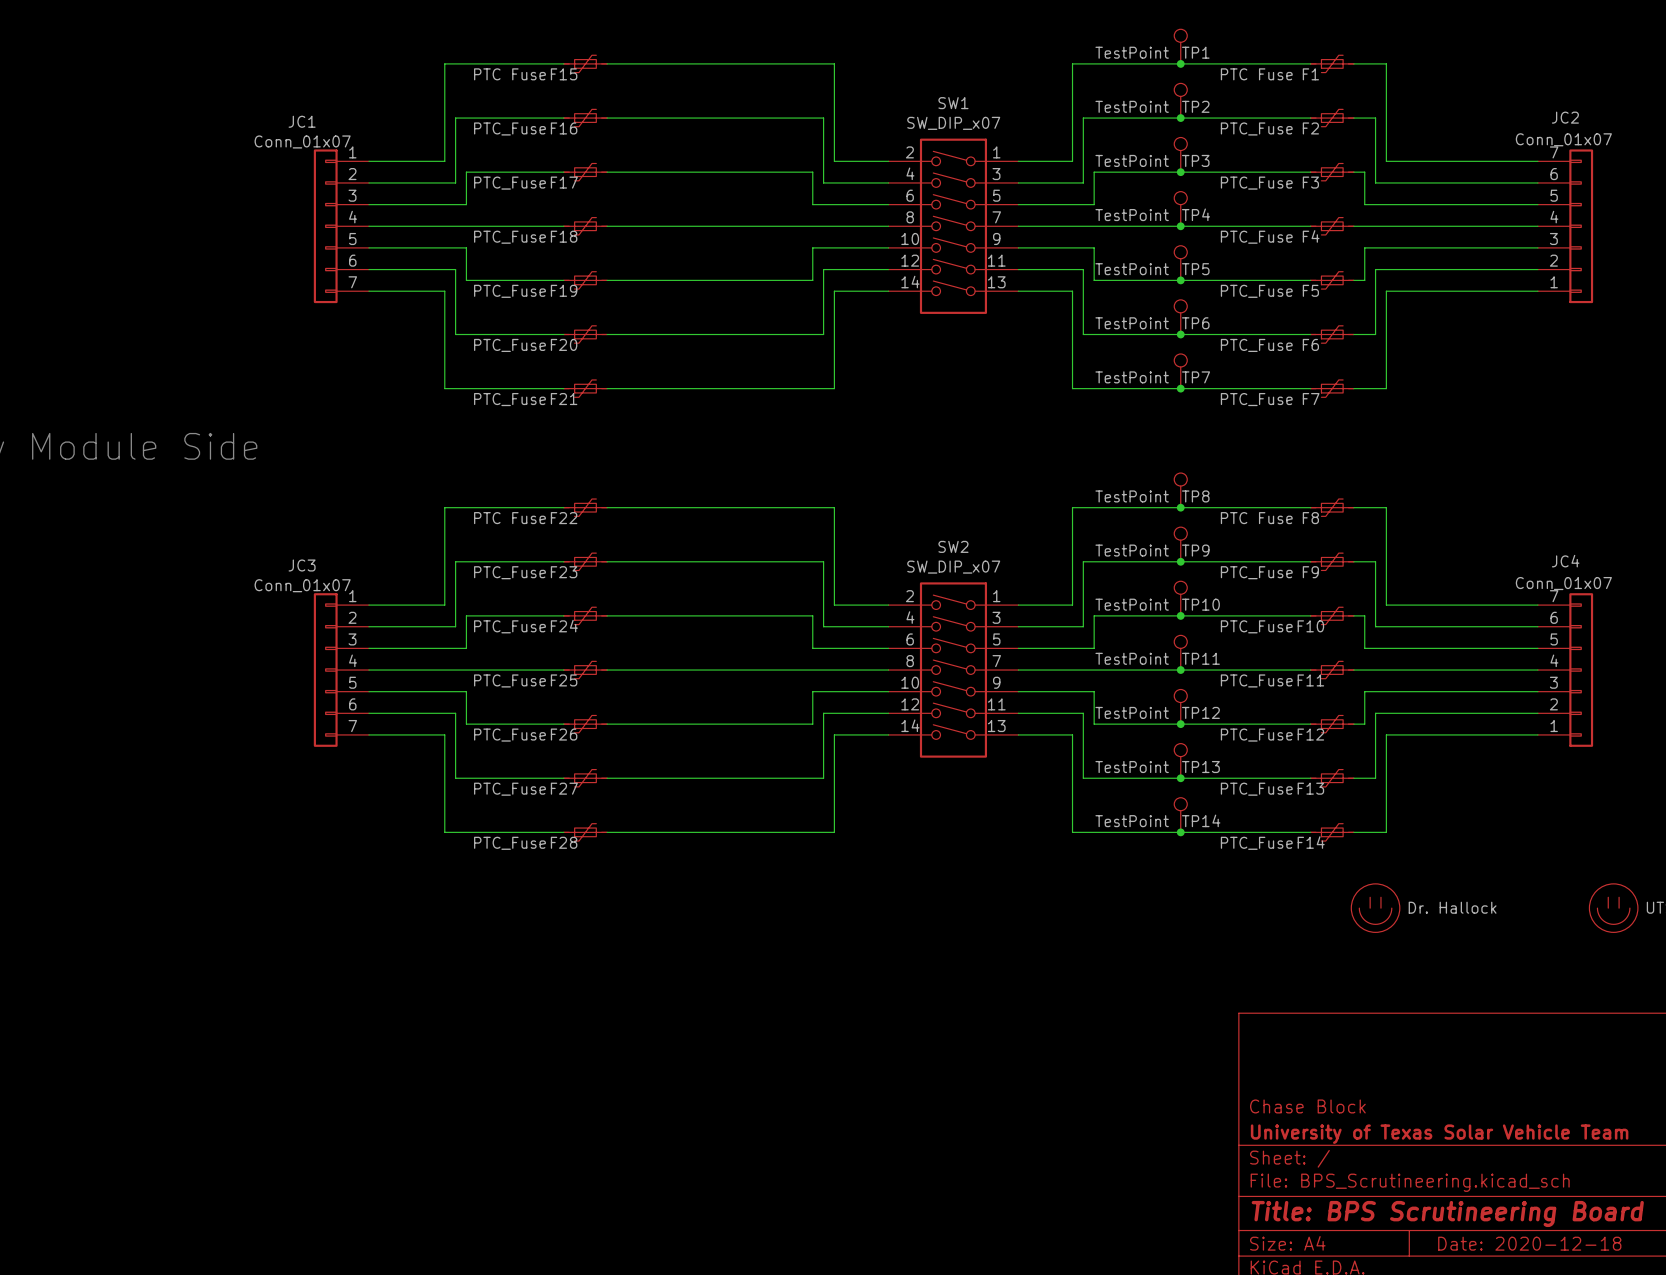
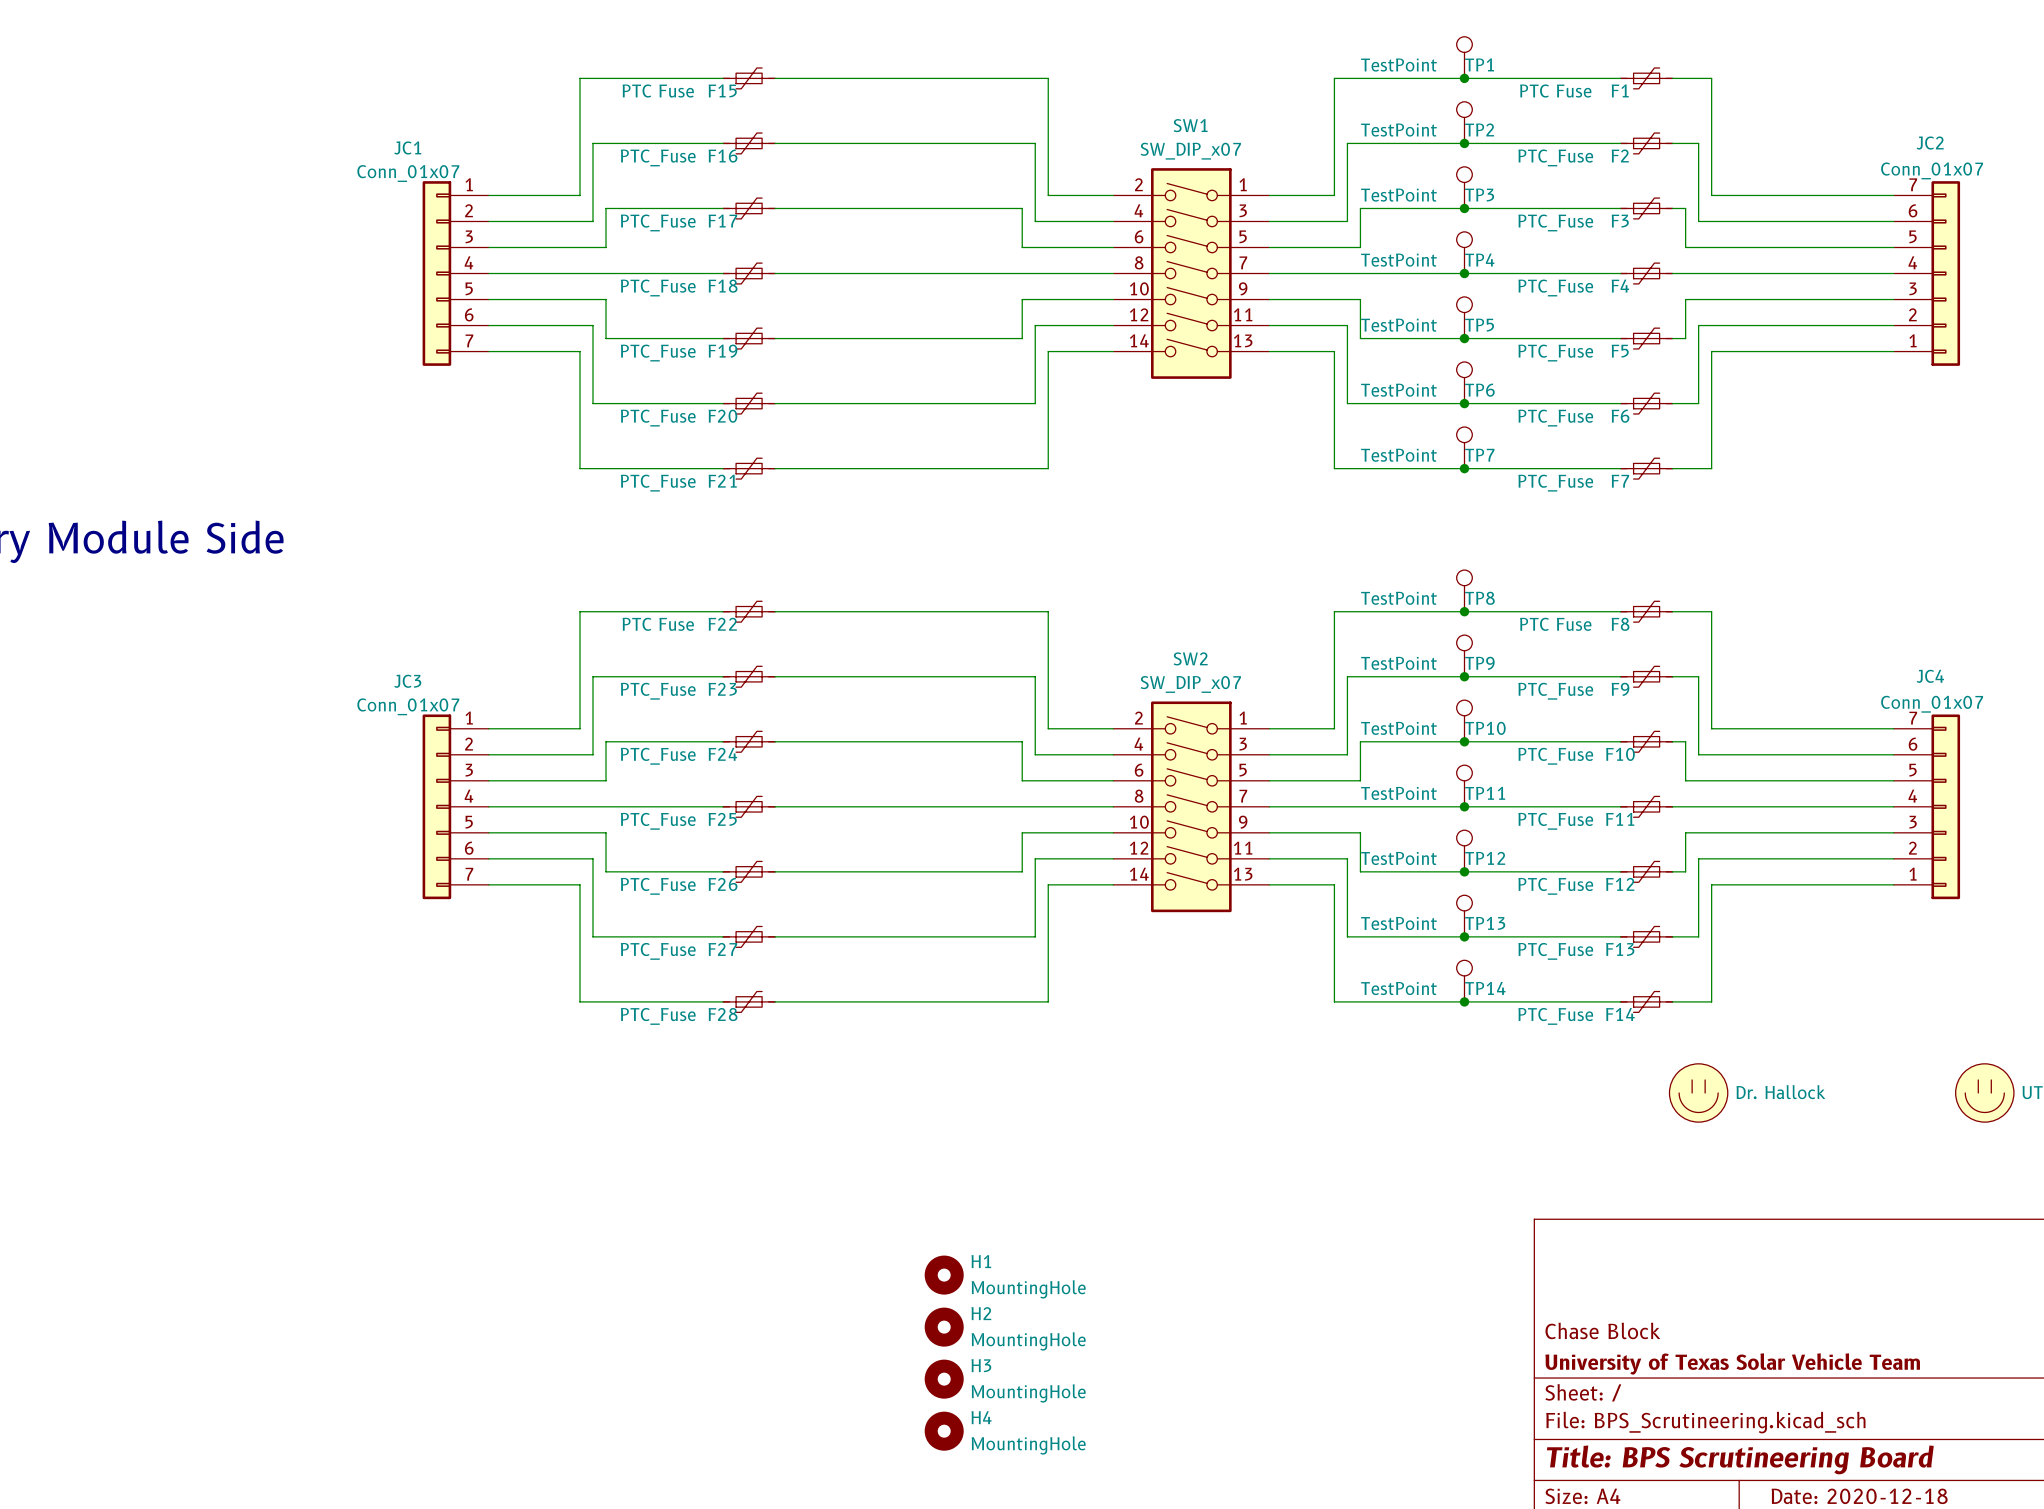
H1: none -> MountingHole (944, 1275)
H2: none -> MountingHole (944, 1327)
H3: none -> MountingHole (944, 1379)
H4: none -> MountingHole (944, 1431)

